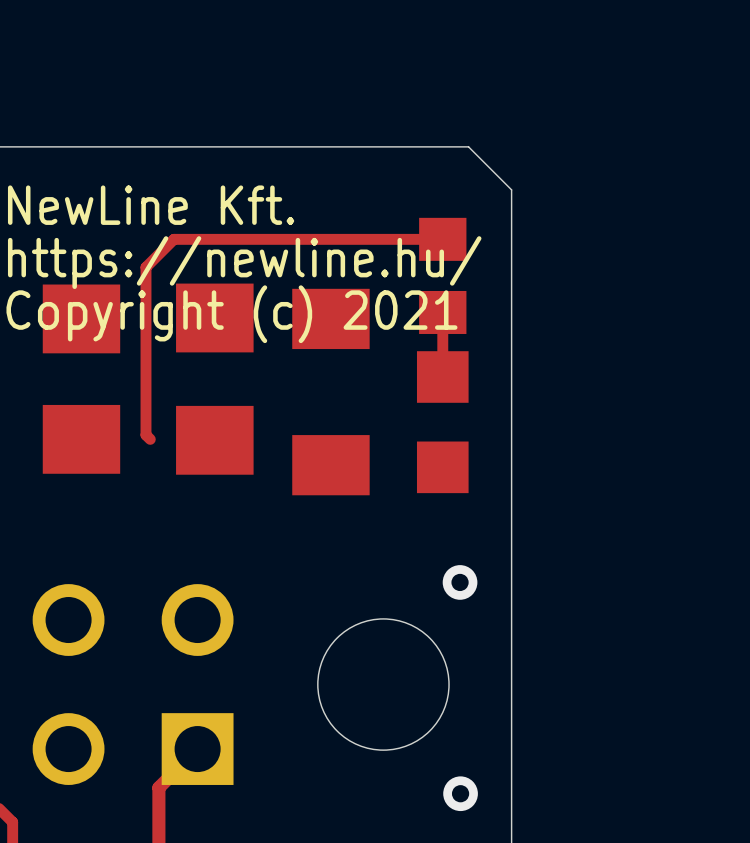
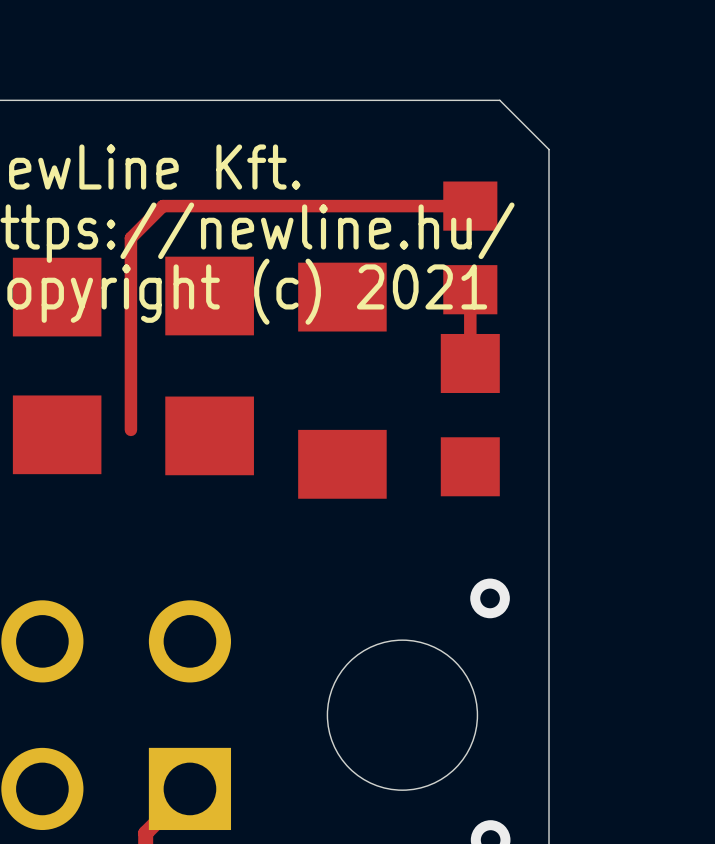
top track: (145, 435) (150, 439) -> none

